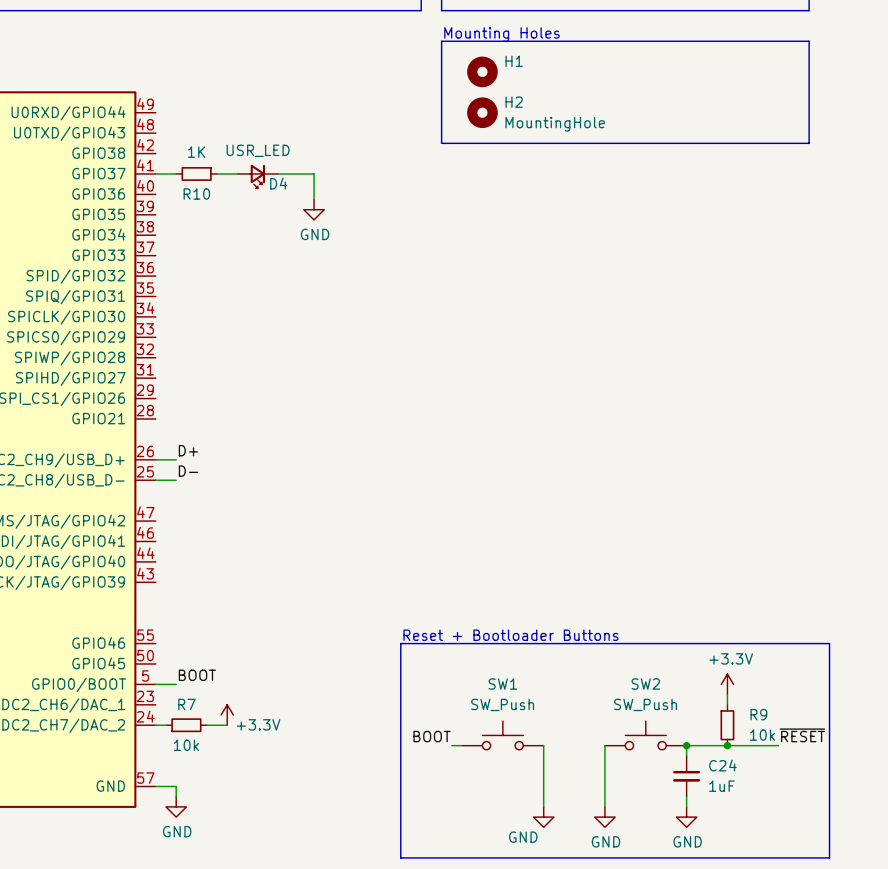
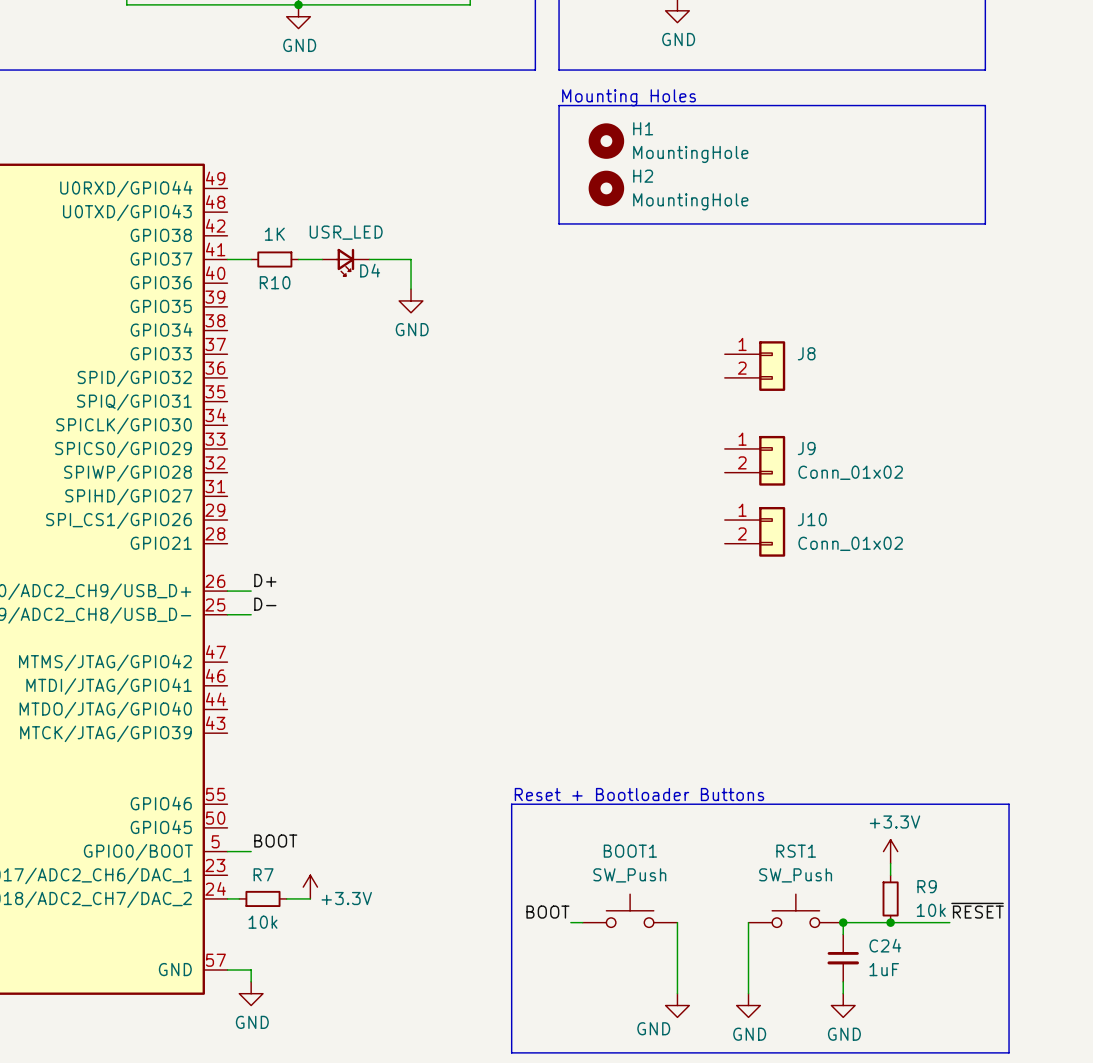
H1 value: none -> MountingHole (690, 154)
J8: none -> (755, 366)
J9: none -> Conn_01x02 (755, 460)
J10: none -> Conn_01x02 (755, 531)
SW1 name: SW1 (502, 684) -> BOOT1 (630, 851)
SW2 name: SW2 (645, 684) -> RST1 (796, 851)

